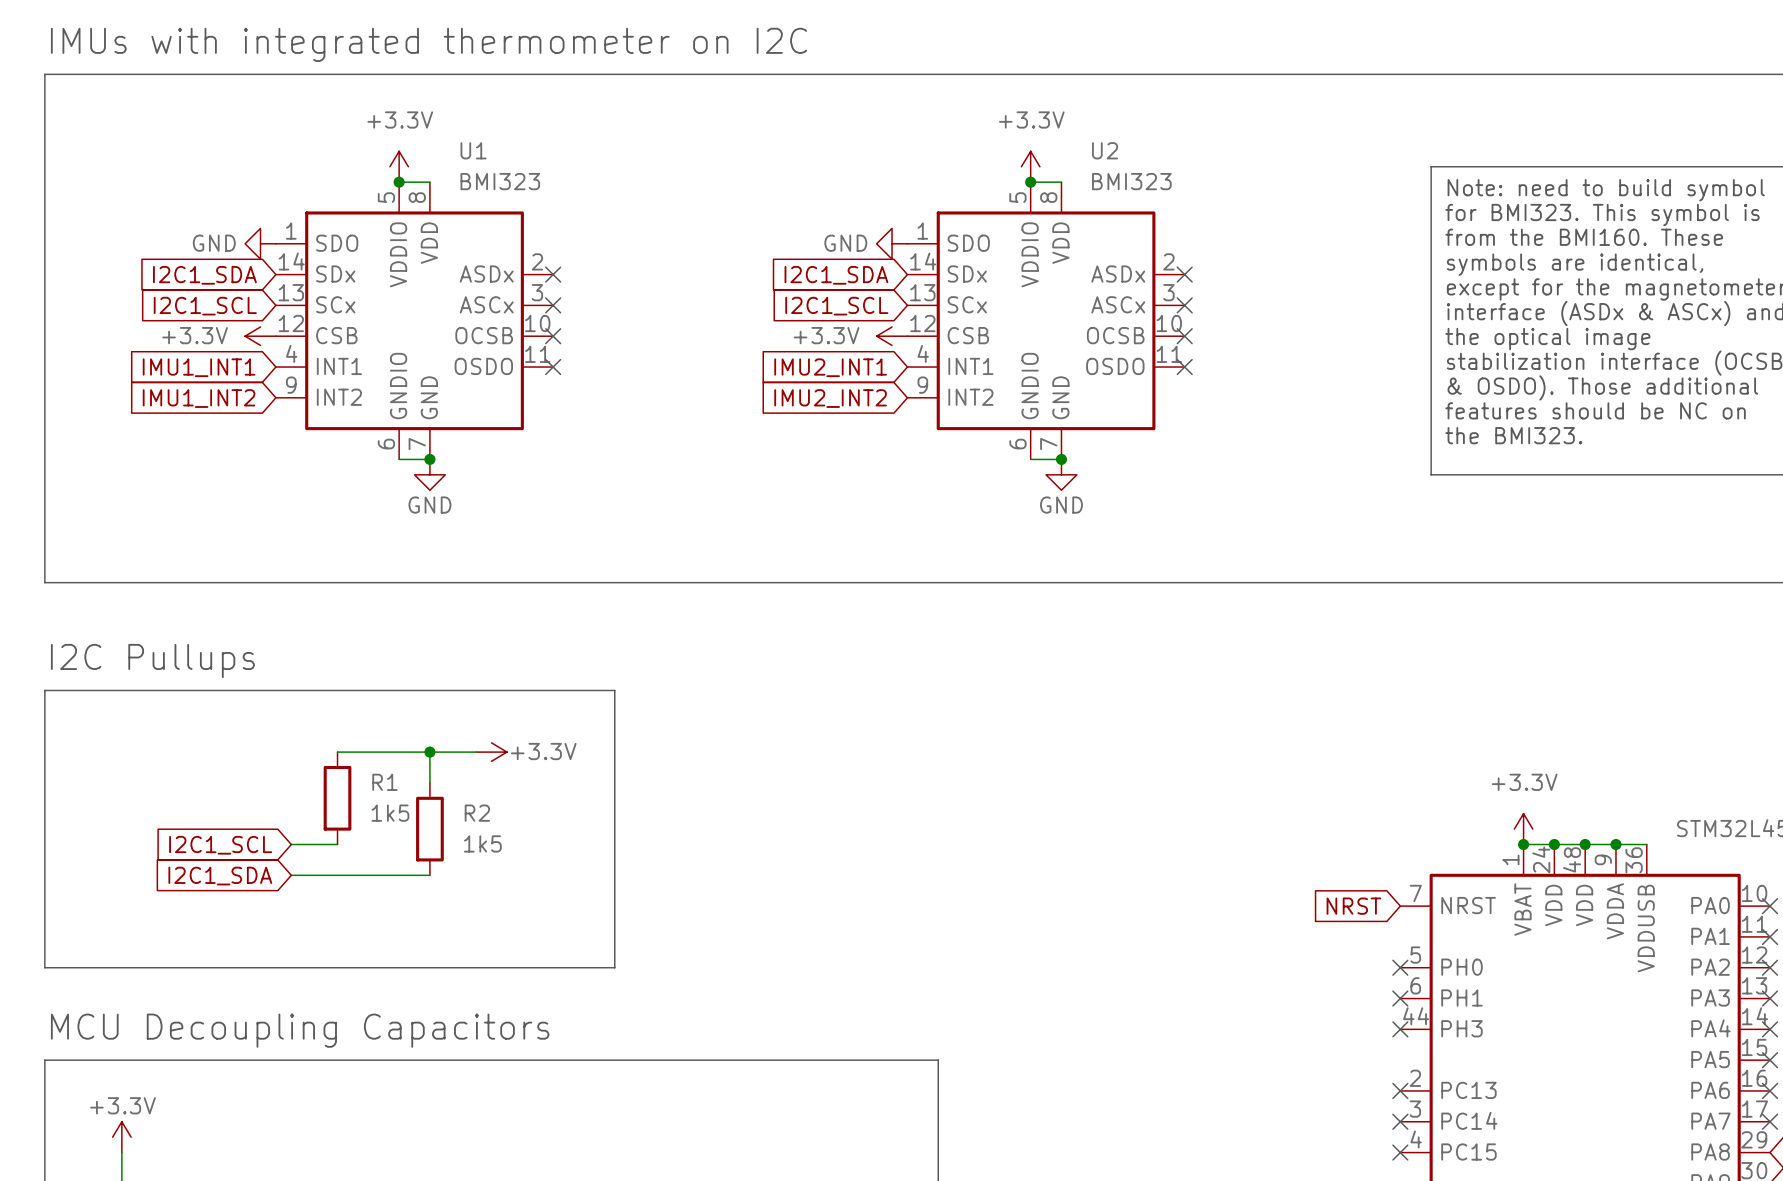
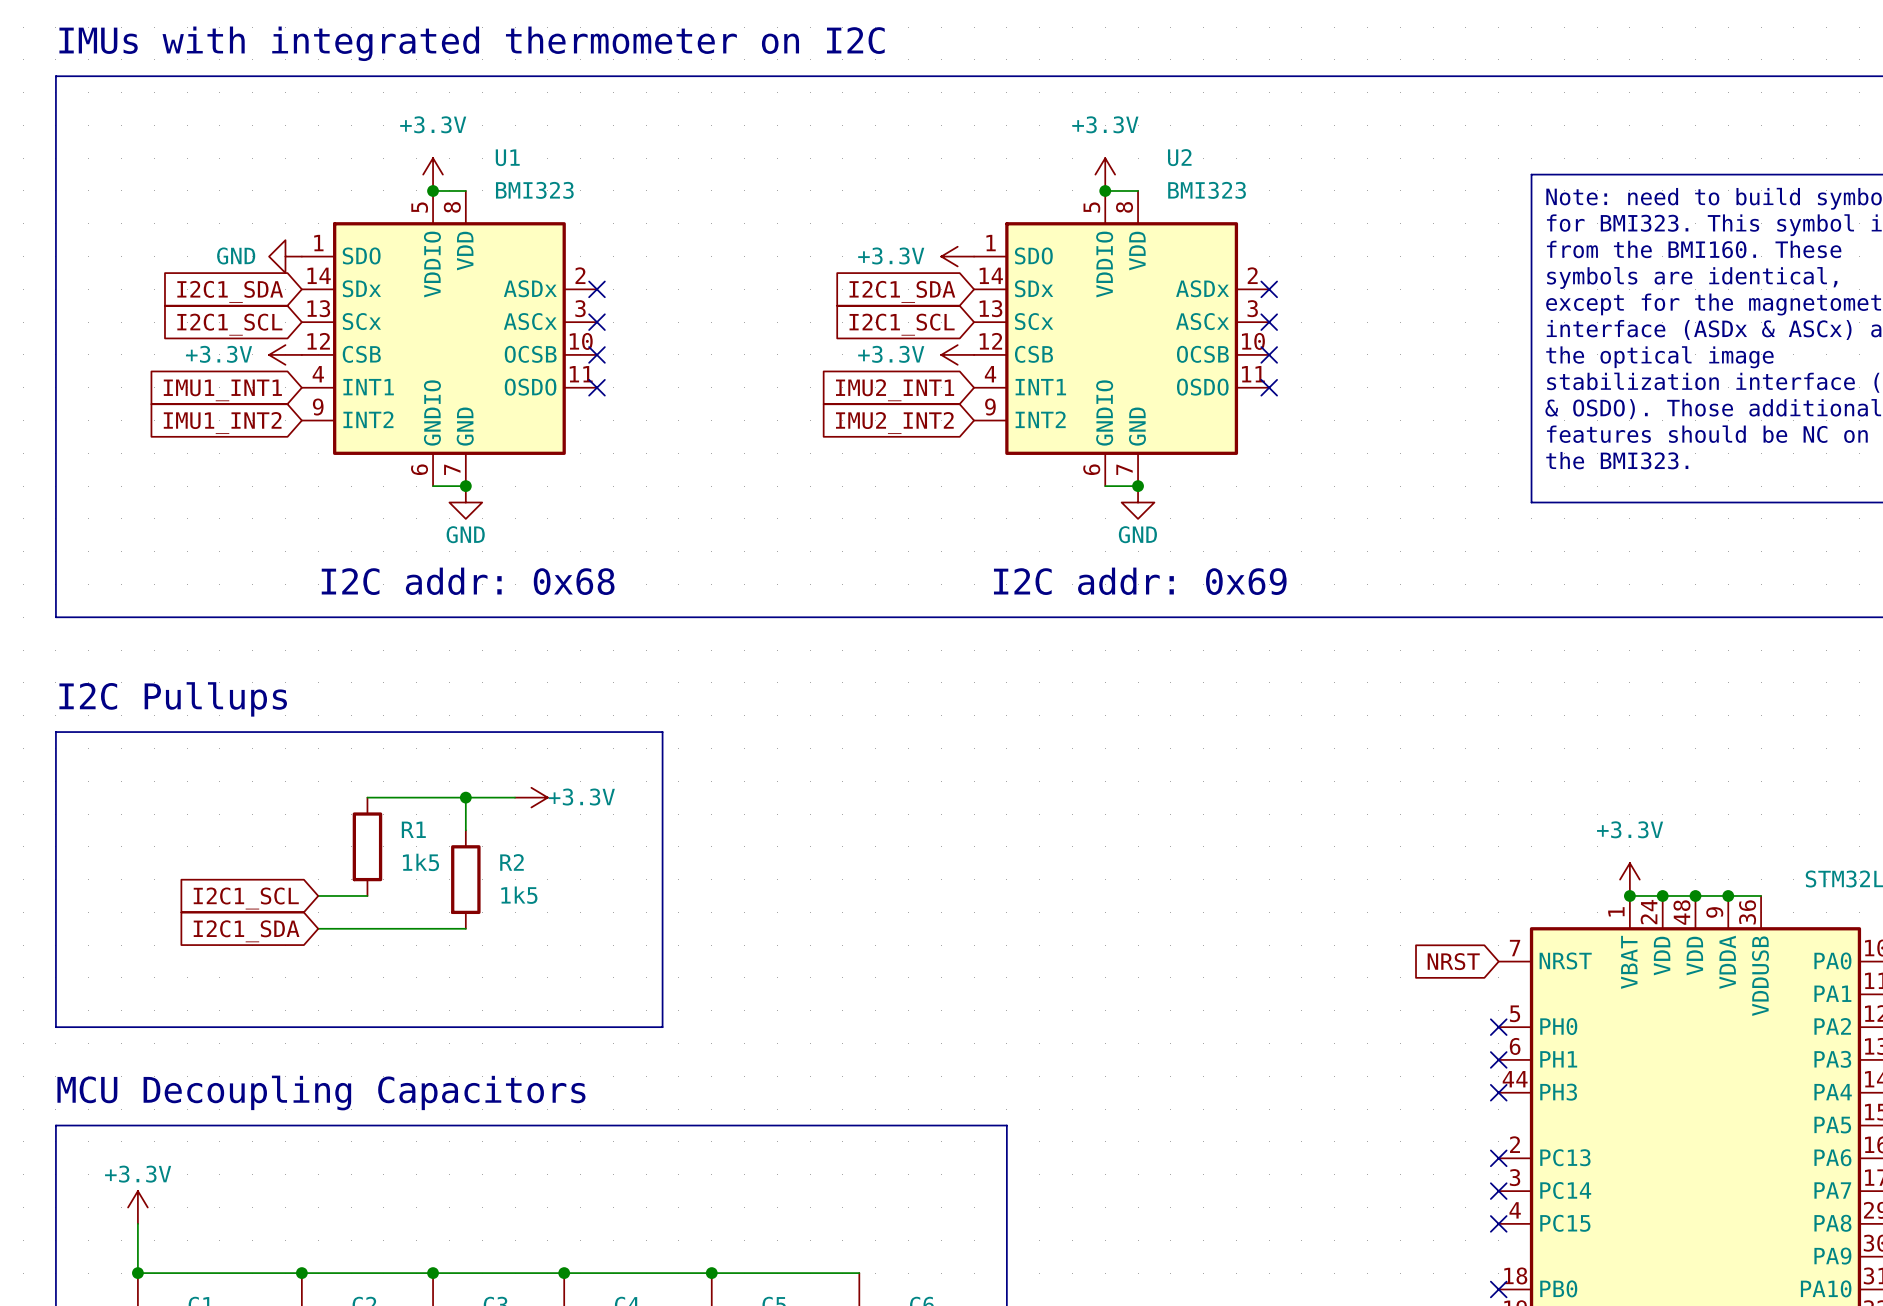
power symbol: GND (892, 243) -> +3.3V (957, 256)
text: none -> I2C addr: 0x68 (468, 581)
text: none -> I2C addr: 0x69 (1140, 581)

